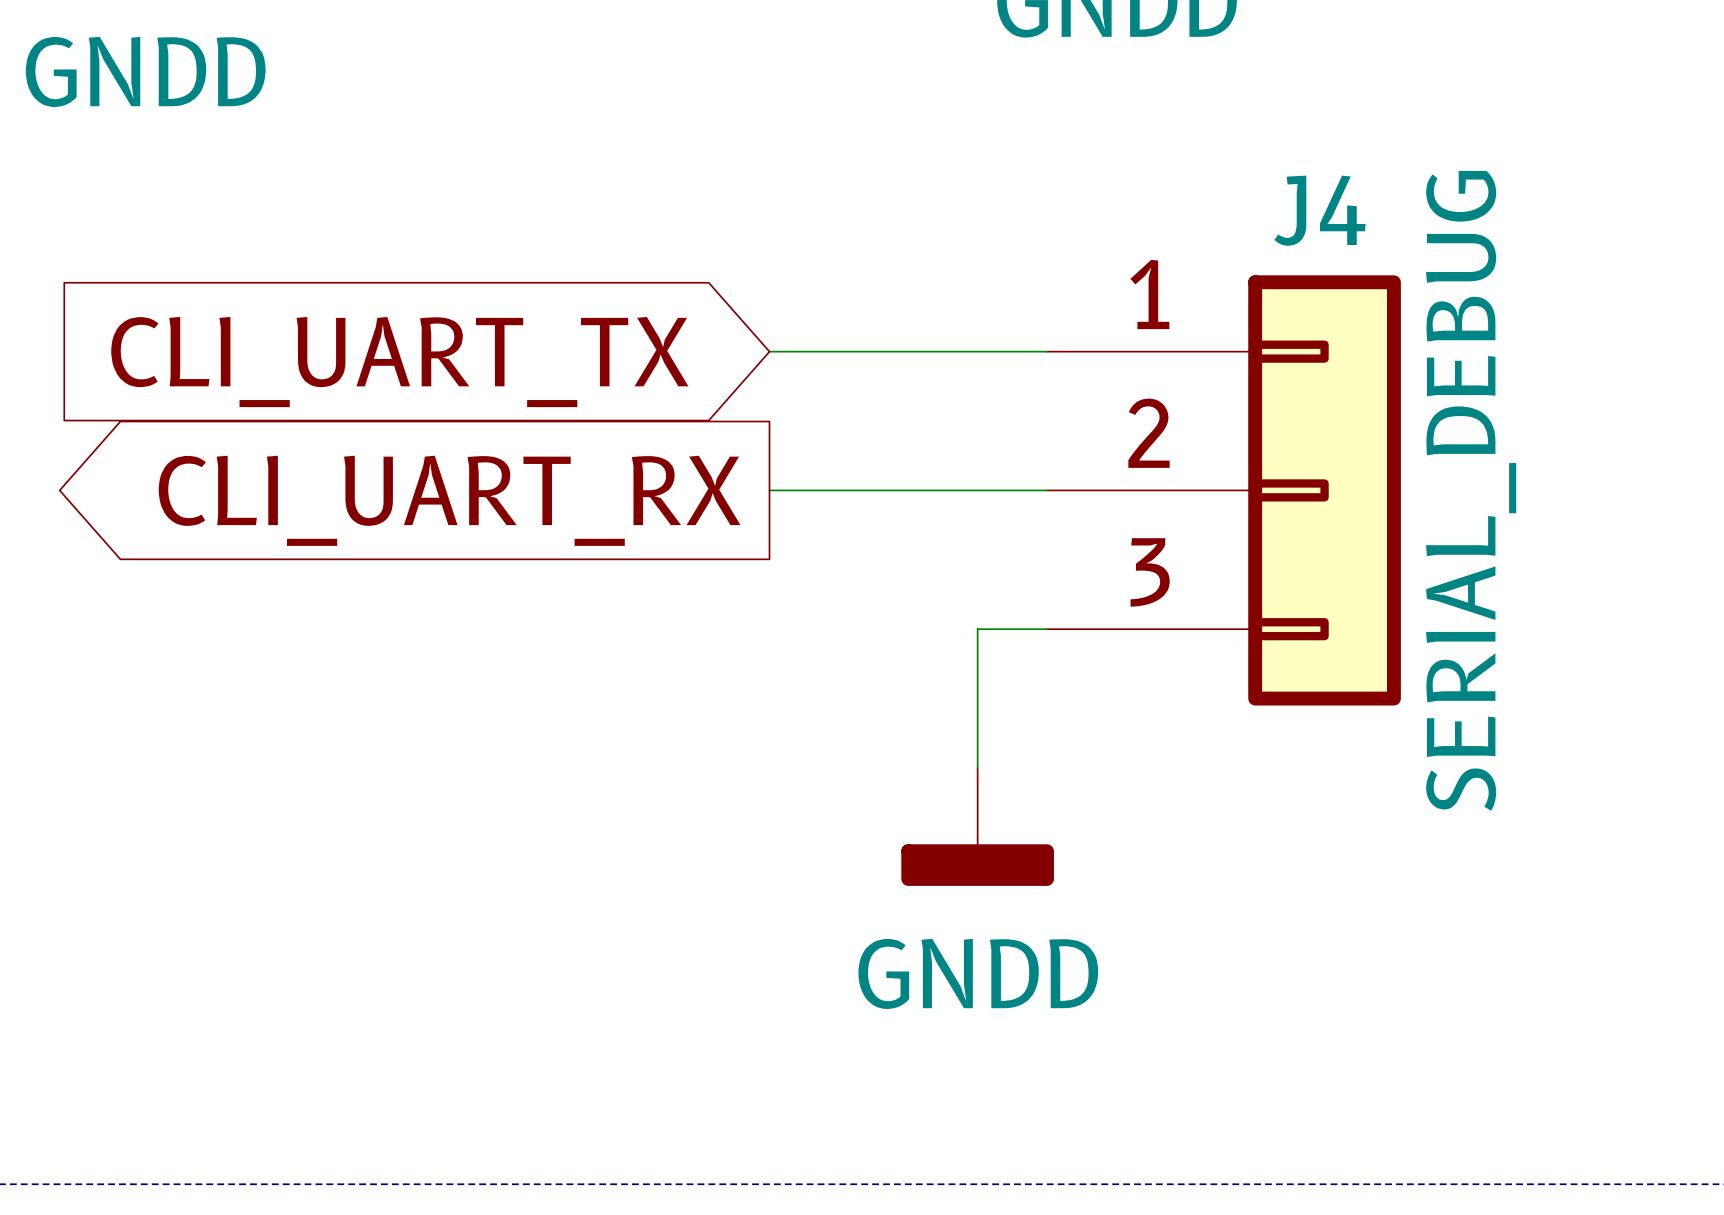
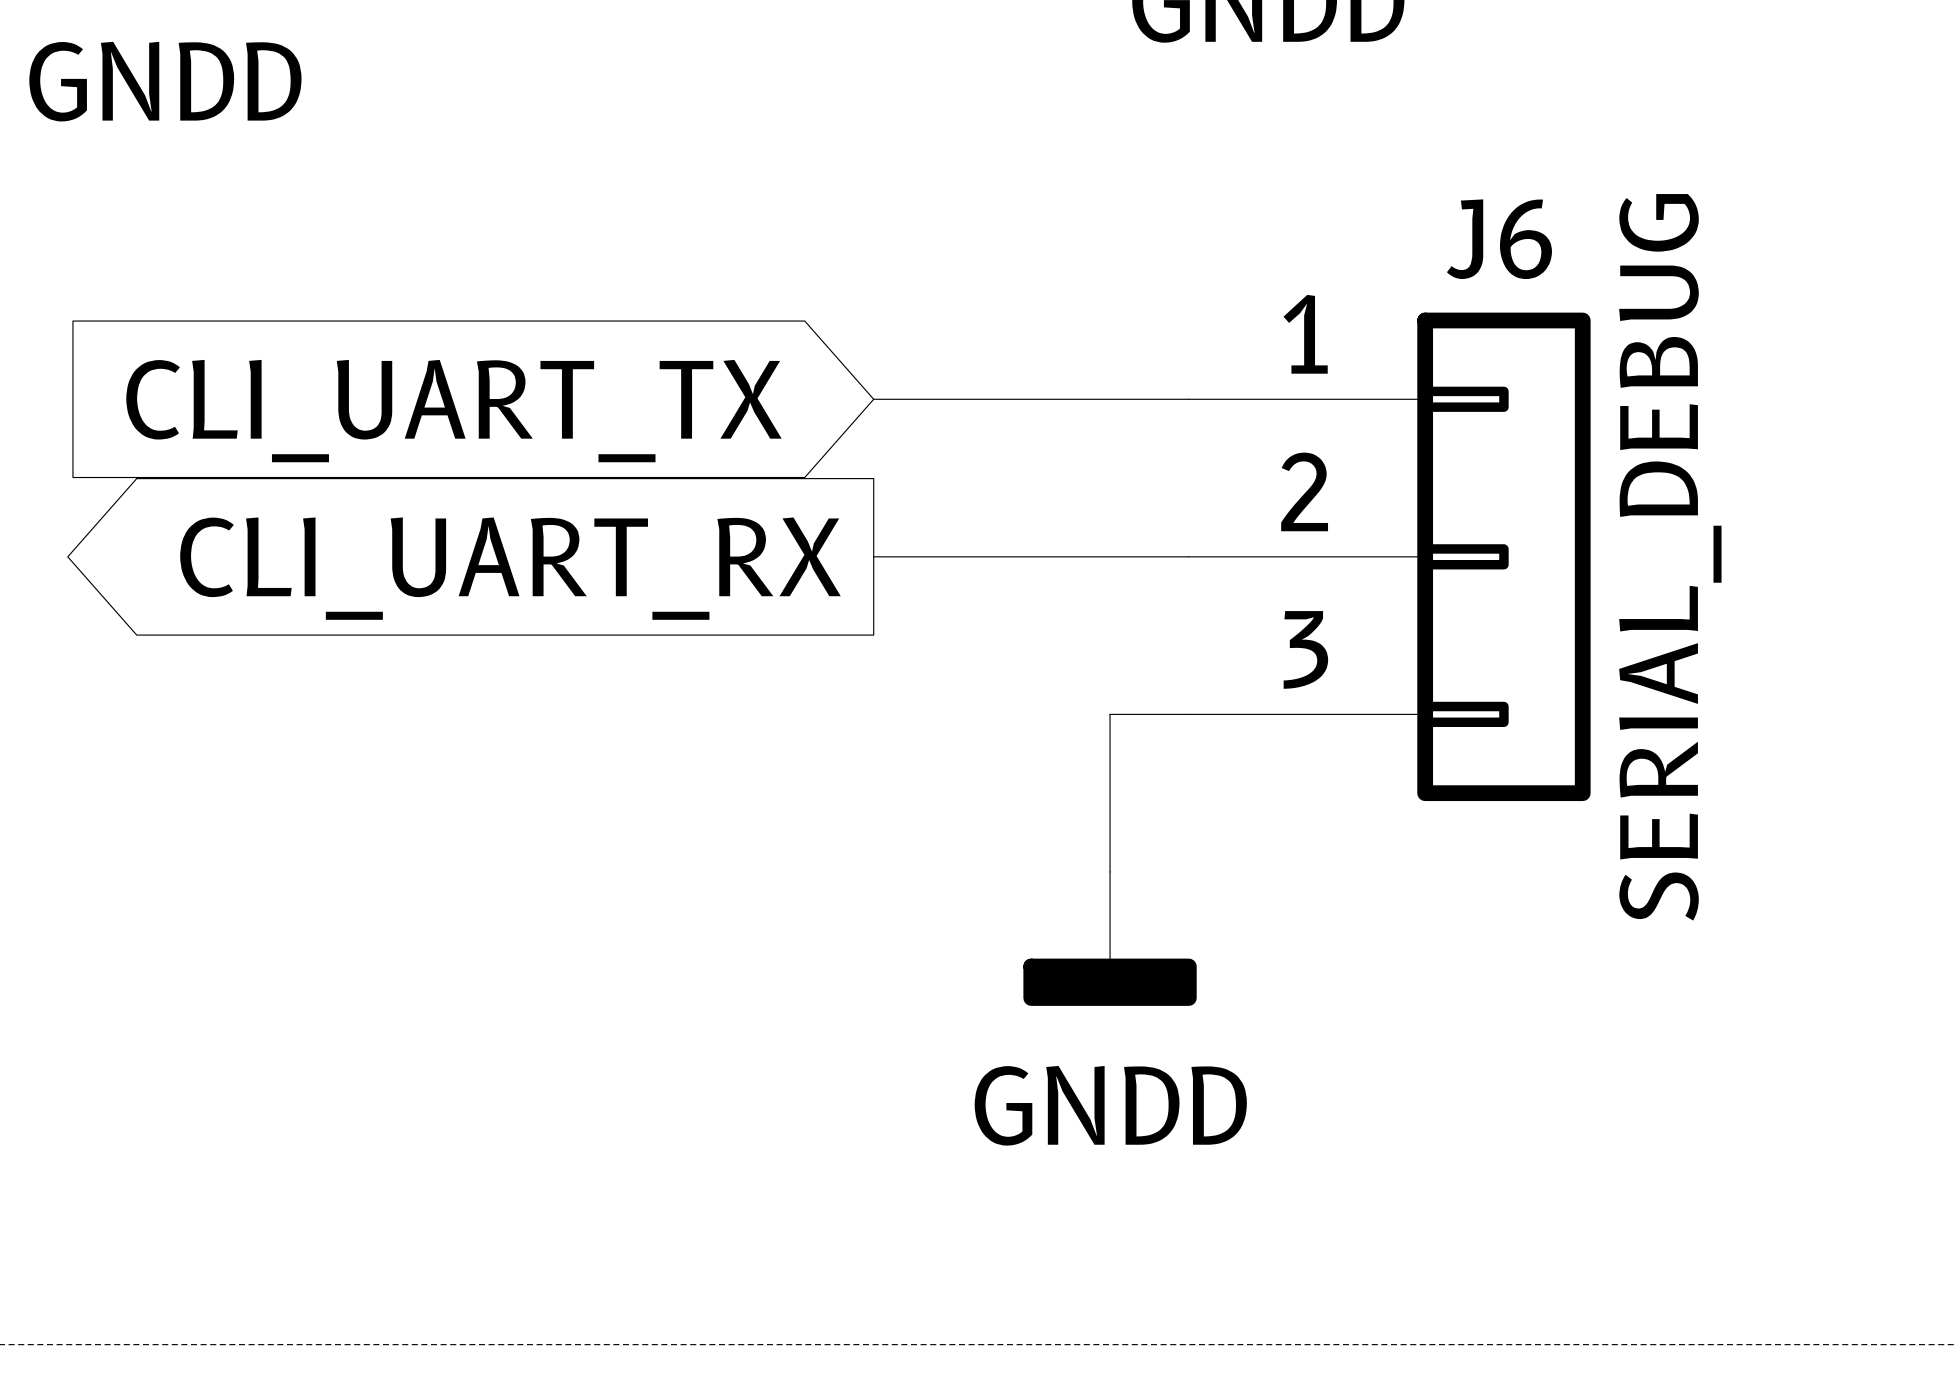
J4 name: J4 (1319, 210) -> J6 (1499, 239)

